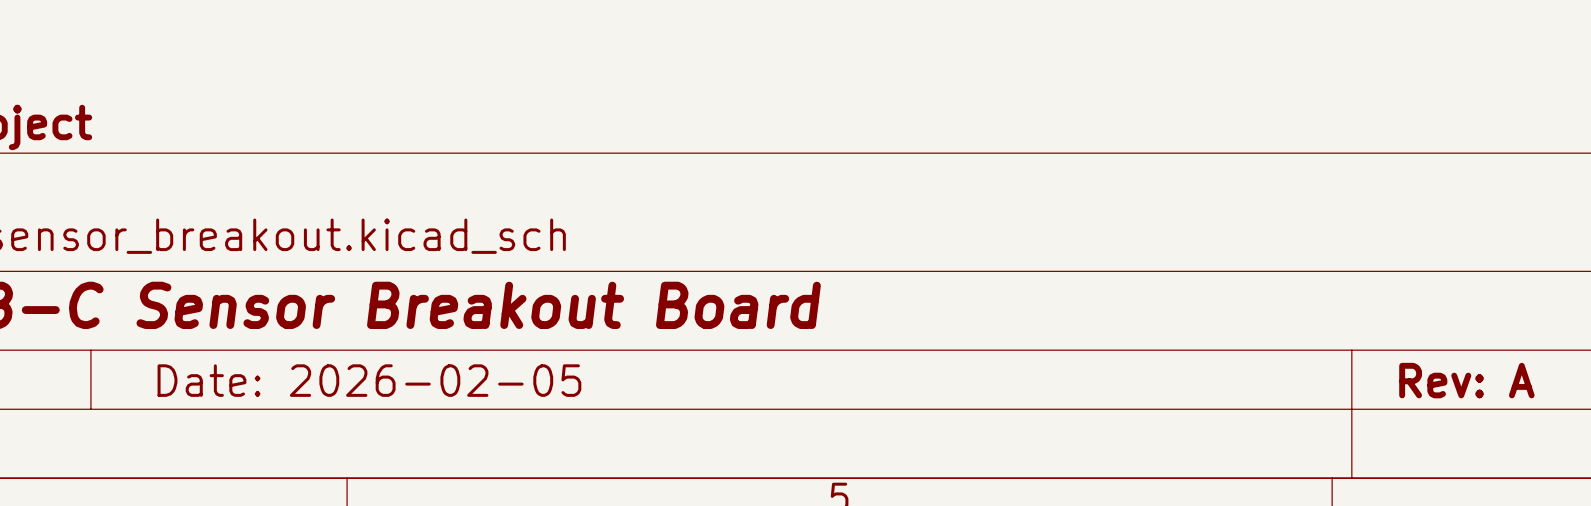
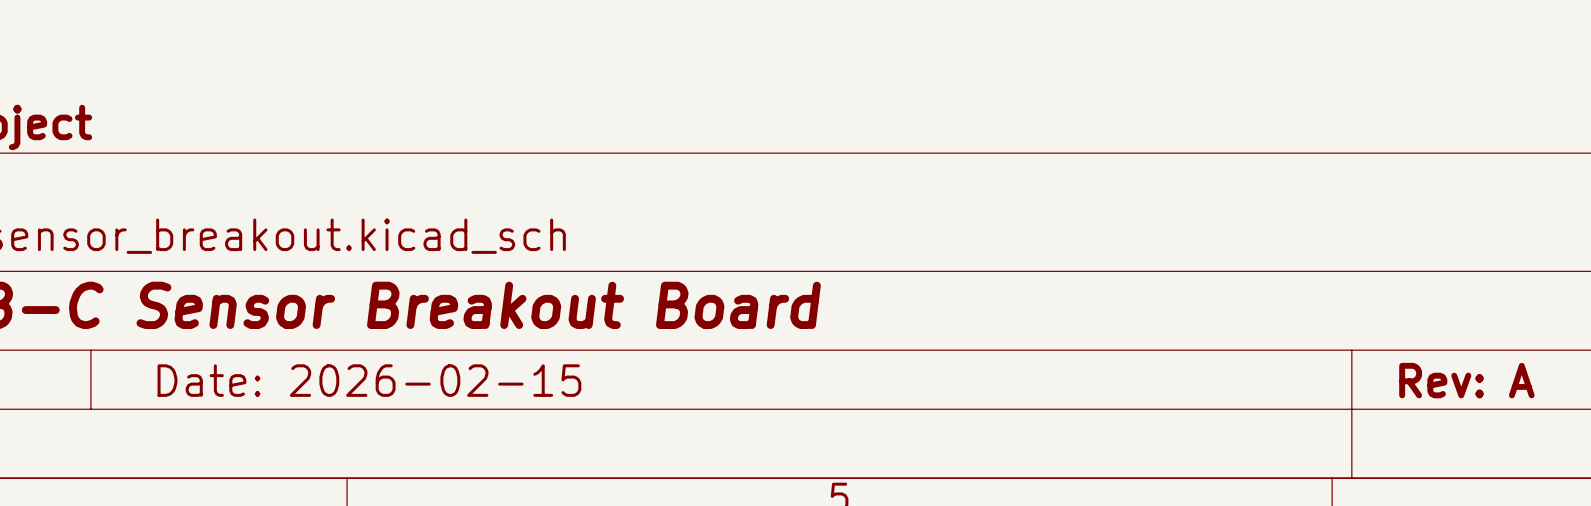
title block: Date: 2026-02-05 (369, 380) -> Date: 2026-02-15 (369, 380)

